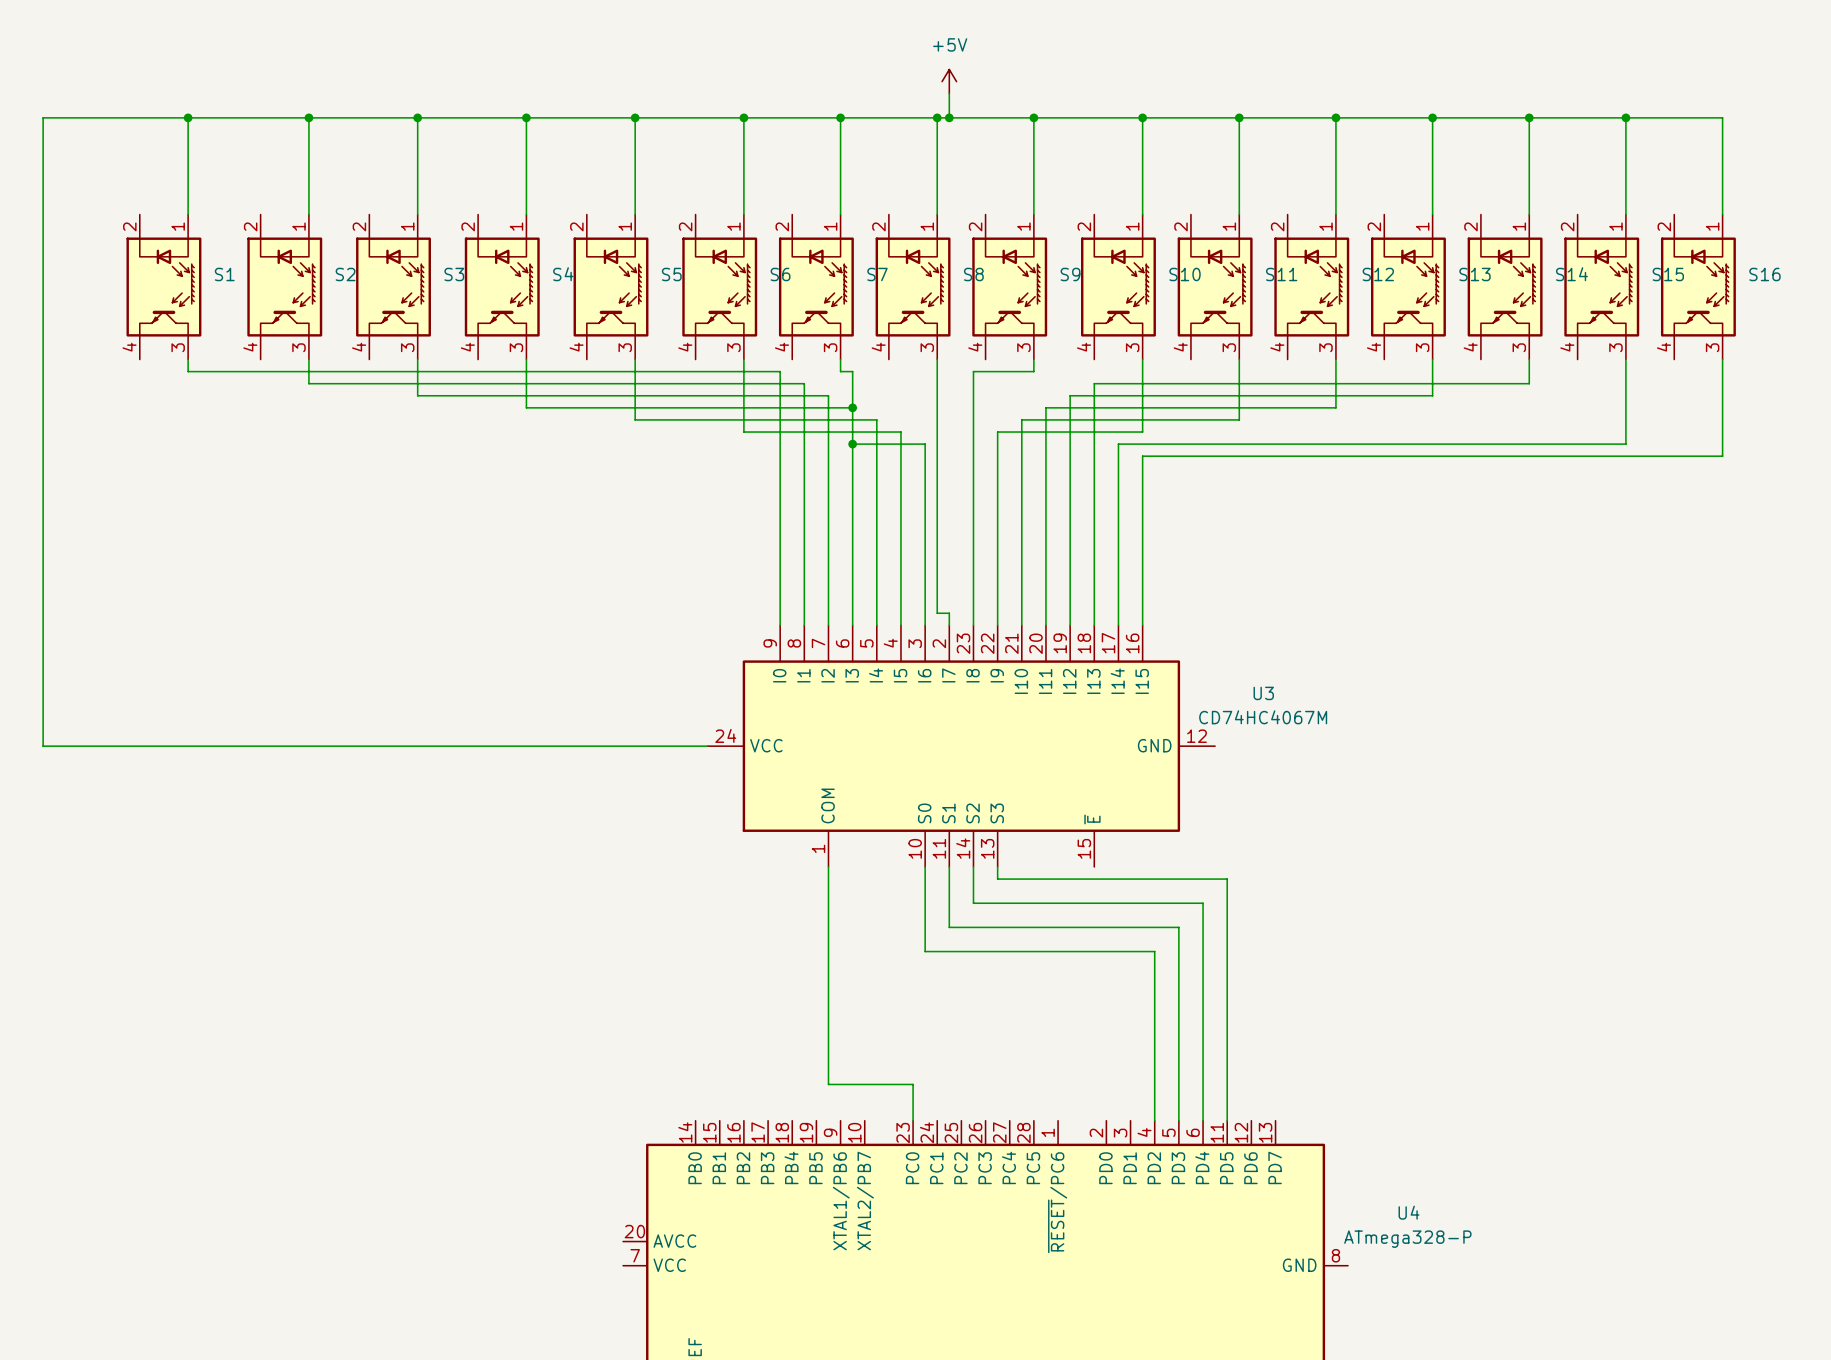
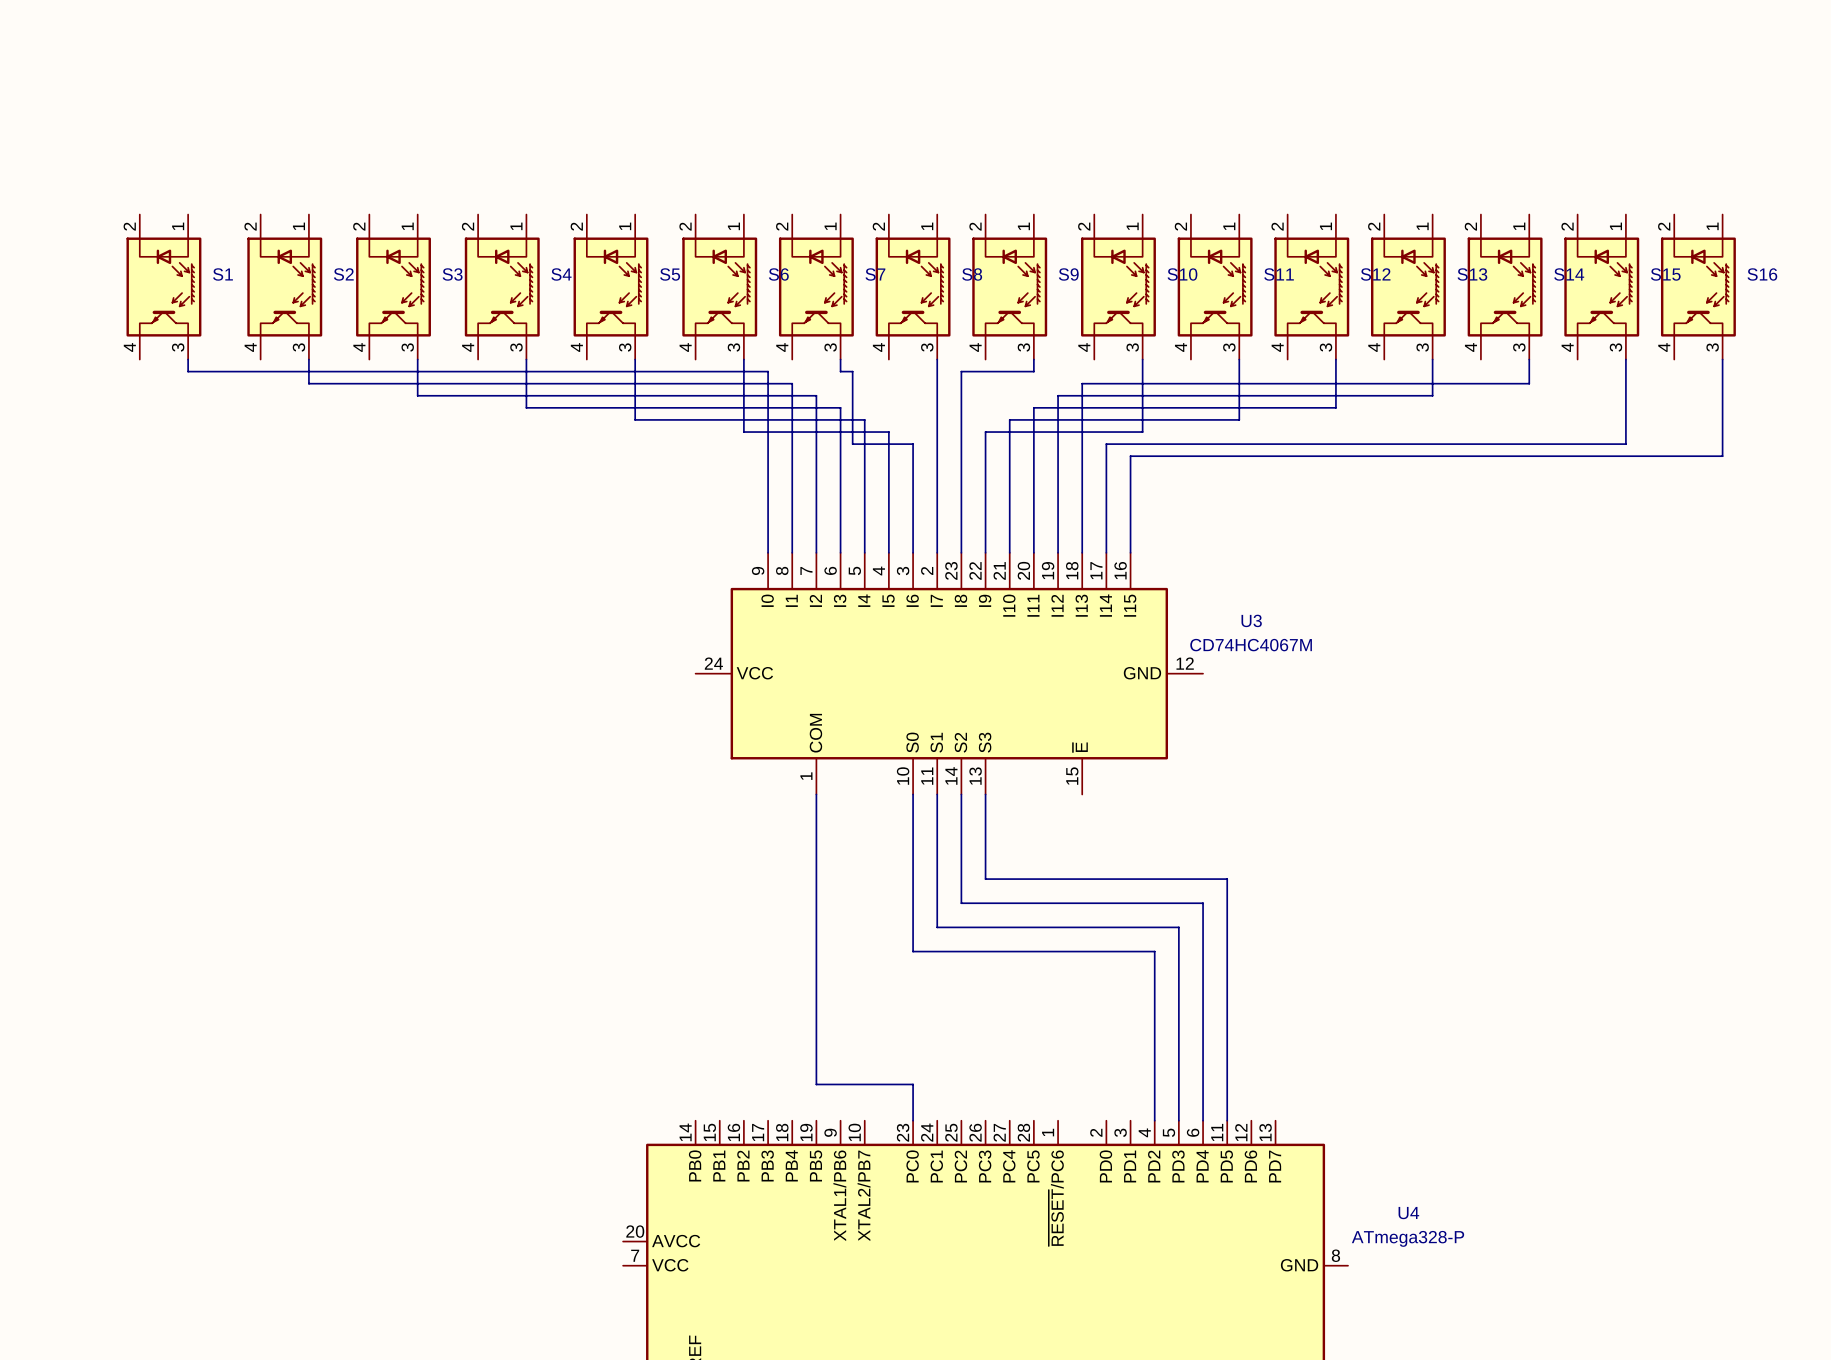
power symbol: +5V (949, 81) -> none
wire: (949, 93) (949, 117) -> none
wire: (188, 117) (188, 214) -> none
junction: (188, 117) -> none
wire: (308, 117) (308, 214) -> none
junction: (308, 117) -> none
wire: (417, 117) (417, 214) -> none
junction: (417, 117) -> none
wire: (526, 117) (526, 214) -> none
junction: (526, 117) -> none
wire: (635, 117) (635, 214) -> none
junction: (635, 117) -> none
wire: (743, 117) (743, 214) -> none
junction: (743, 117) -> none
wire: (840, 117) (840, 214) -> none
junction: (840, 117) -> none
wire: (937, 117) (937, 214) -> none
junction: (937, 117) -> none
junction: (949, 117) -> none
wire: (1033, 117) (1033, 214) -> none
junction: (1033, 117) -> none
wire: (1142, 117) (1142, 214) -> none
junction: (1142, 117) -> none
wire: (1239, 117) (1239, 214) -> none
junction: (1239, 117) -> none
wire: (1335, 117) (1335, 214) -> none
junction: (1335, 117) -> none
wire: (1432, 117) (1432, 214) -> none
junction: (1432, 117) -> none
wire: (1529, 117) (1529, 214) -> none
junction: (1529, 117) -> none
wire: (1625, 117) (1625, 214) -> none
junction: (1625, 117) -> none
wire: (1722, 214) (1722, 117) (43, 117) (43, 746) (707, 746) -> none
wire: (768, 371) (780, 371) (780, 625) -> (768, 371) (768, 552)
wire: (973, 371) (973, 625) -> (973, 371) (961, 371) (961, 552)
wire: (792, 383) (804, 383) (804, 625) -> (792, 383) (792, 552)
wire: (1094, 383) (1094, 625) -> (1094, 383) (1082, 383) (1082, 552)
wire: (816, 395) (828, 395) (828, 625) -> (816, 395) (816, 552)
wire: (1070, 395) (1070, 625) -> (1070, 395) (1058, 395) (1058, 552)
wire: (840, 407) (852, 407) -> (840, 407) (840, 552)
junction: (852, 407) -> none
wire: (1045, 407) (1045, 625) -> (1045, 407) (1033, 407) (1033, 552)
wire: (864, 419) (876, 419) (876, 625) -> (864, 419) (864, 552)
wire: (1021, 419) (1021, 625) -> (1021, 419) (1009, 419) (1009, 552)
wire: (888, 432) (900, 432) (900, 625) -> (888, 432) (888, 552)
wire: (997, 432) (997, 625) -> (997, 432) (985, 432) (985, 552)
wire: (852, 444) (852, 625) -> none
junction: (852, 444) -> none
wire: (913, 444) (925, 444) (925, 625) -> (913, 444) (913, 552)
wire: (1118, 444) (1118, 625) -> (1118, 444) (1106, 444) (1106, 552)
wire: (1142, 456) (1142, 625) -> (1142, 456) (1130, 456) (1130, 552)
U3 position: (961, 746) -> (949, 673)
wire: (828, 866) (828, 1084) -> (816, 794) (816, 1084) (828, 1084)
wire: (925, 866) (925, 951) -> (913, 794) (913, 951) (925, 951)
wire: (949, 866) (949, 927) -> (937, 794) (937, 927) (949, 927)
wire: (973, 866) (973, 903) -> (961, 794) (961, 903) (973, 903)
wire: (997, 866) (997, 879) -> (985, 794) (985, 879) (997, 879)

